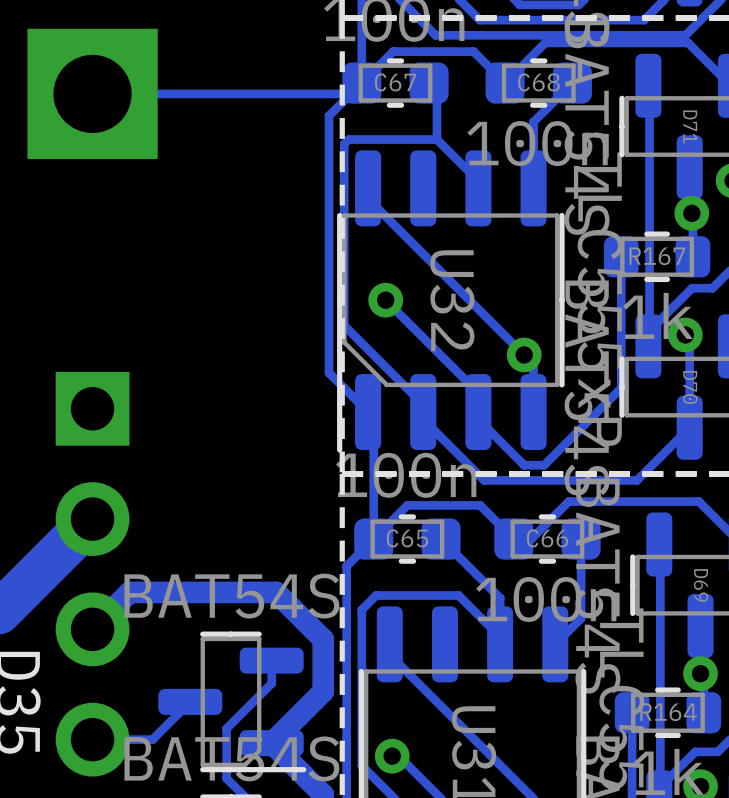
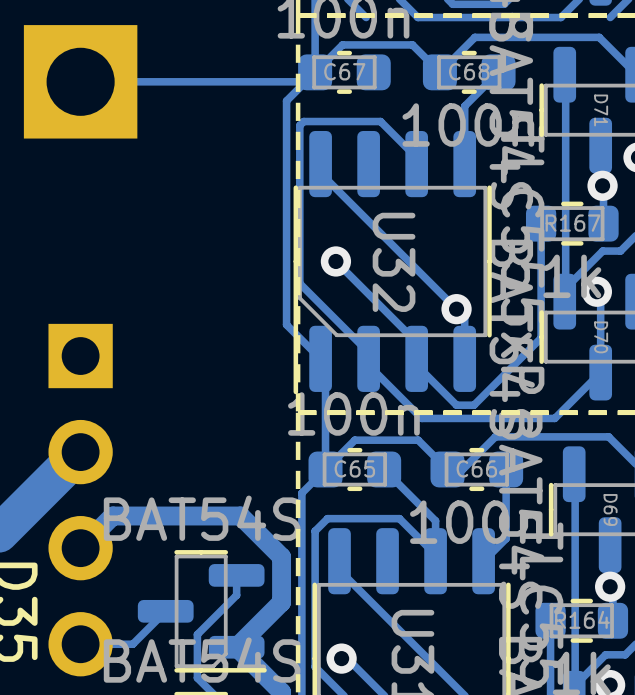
track: (700, 20) (685, 35) (435, 35) (420, 20) -> none
track: (429, 83) (436, 90) (436, 139) -> none

